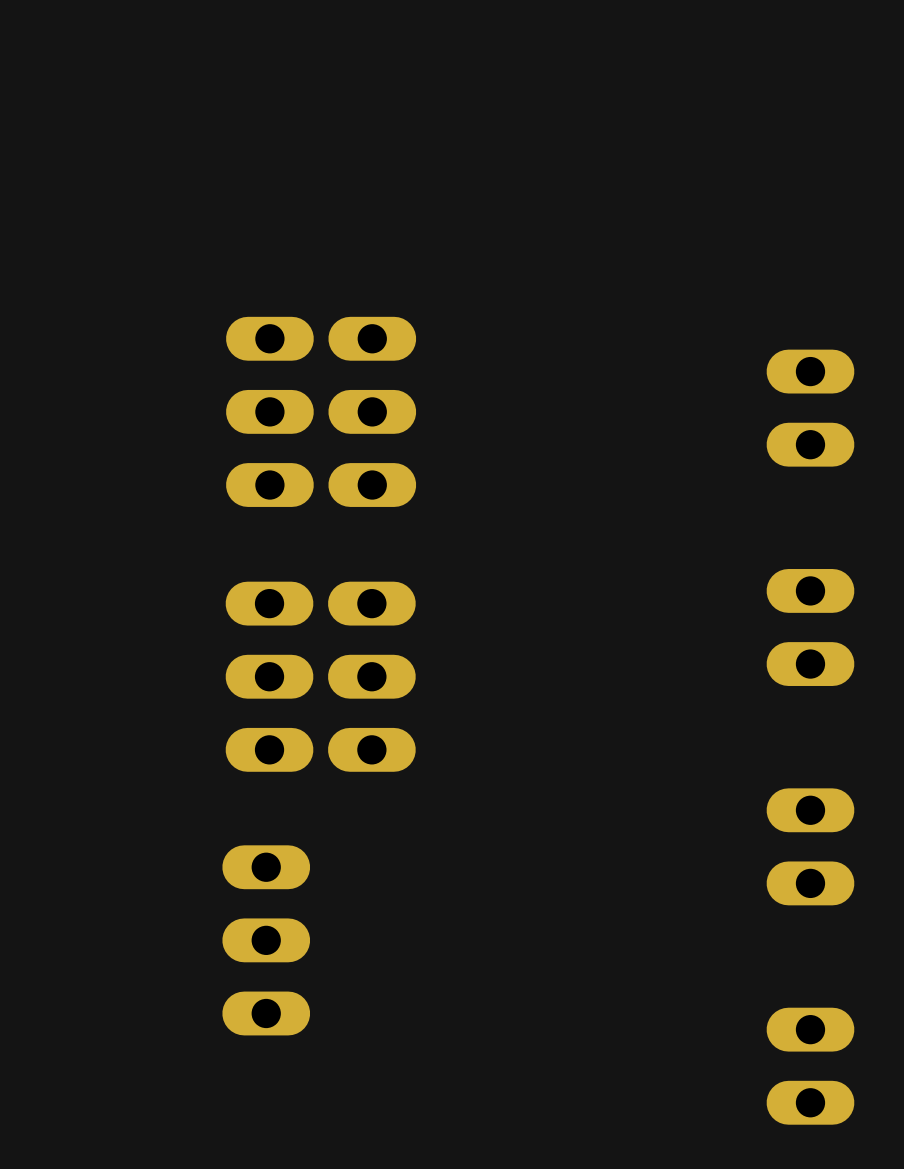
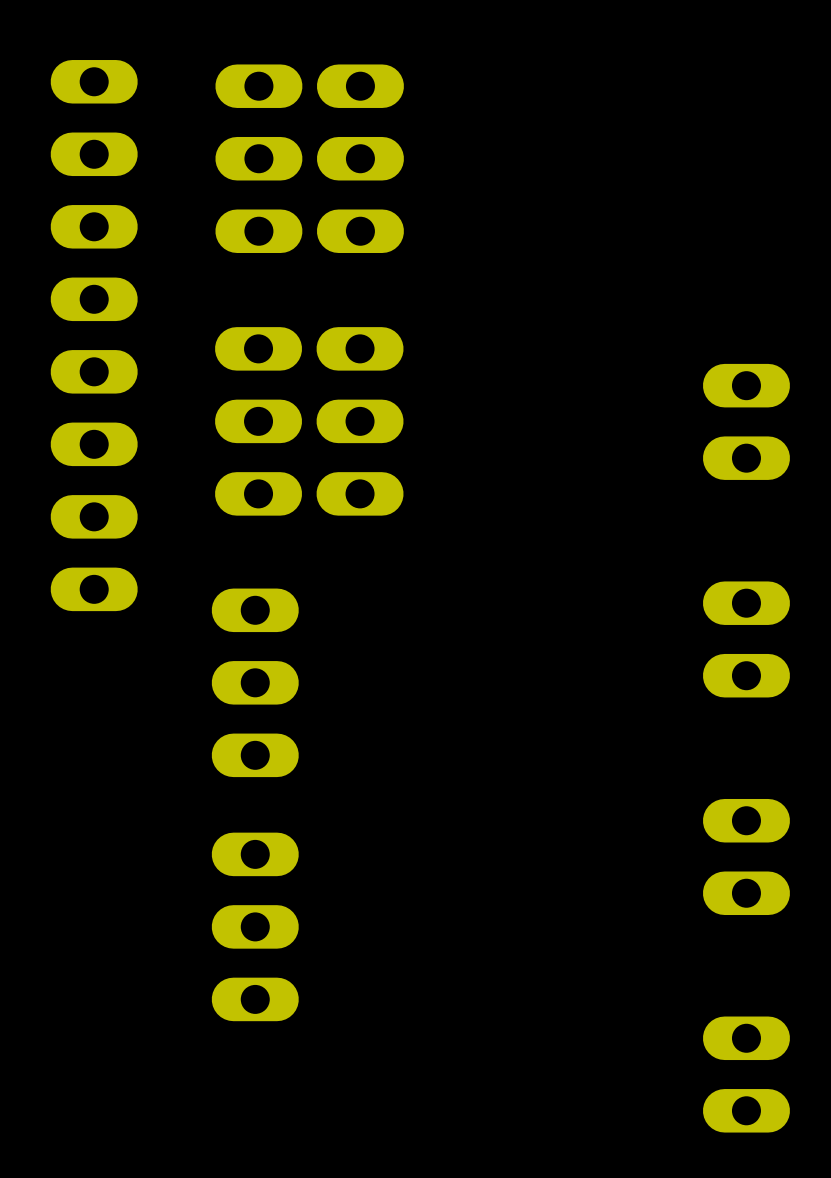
part: none -> (258, 158)
part: none -> (360, 158)
part: none -> (94, 335)
part: none -> (258, 421)
part: none -> (360, 421)
part: (269, 411) -> none
part: (372, 411) -> none
part: none -> (255, 682)
part: (269, 676) -> none
part: (371, 676) -> none
part position: (266, 940) -> (255, 926)

